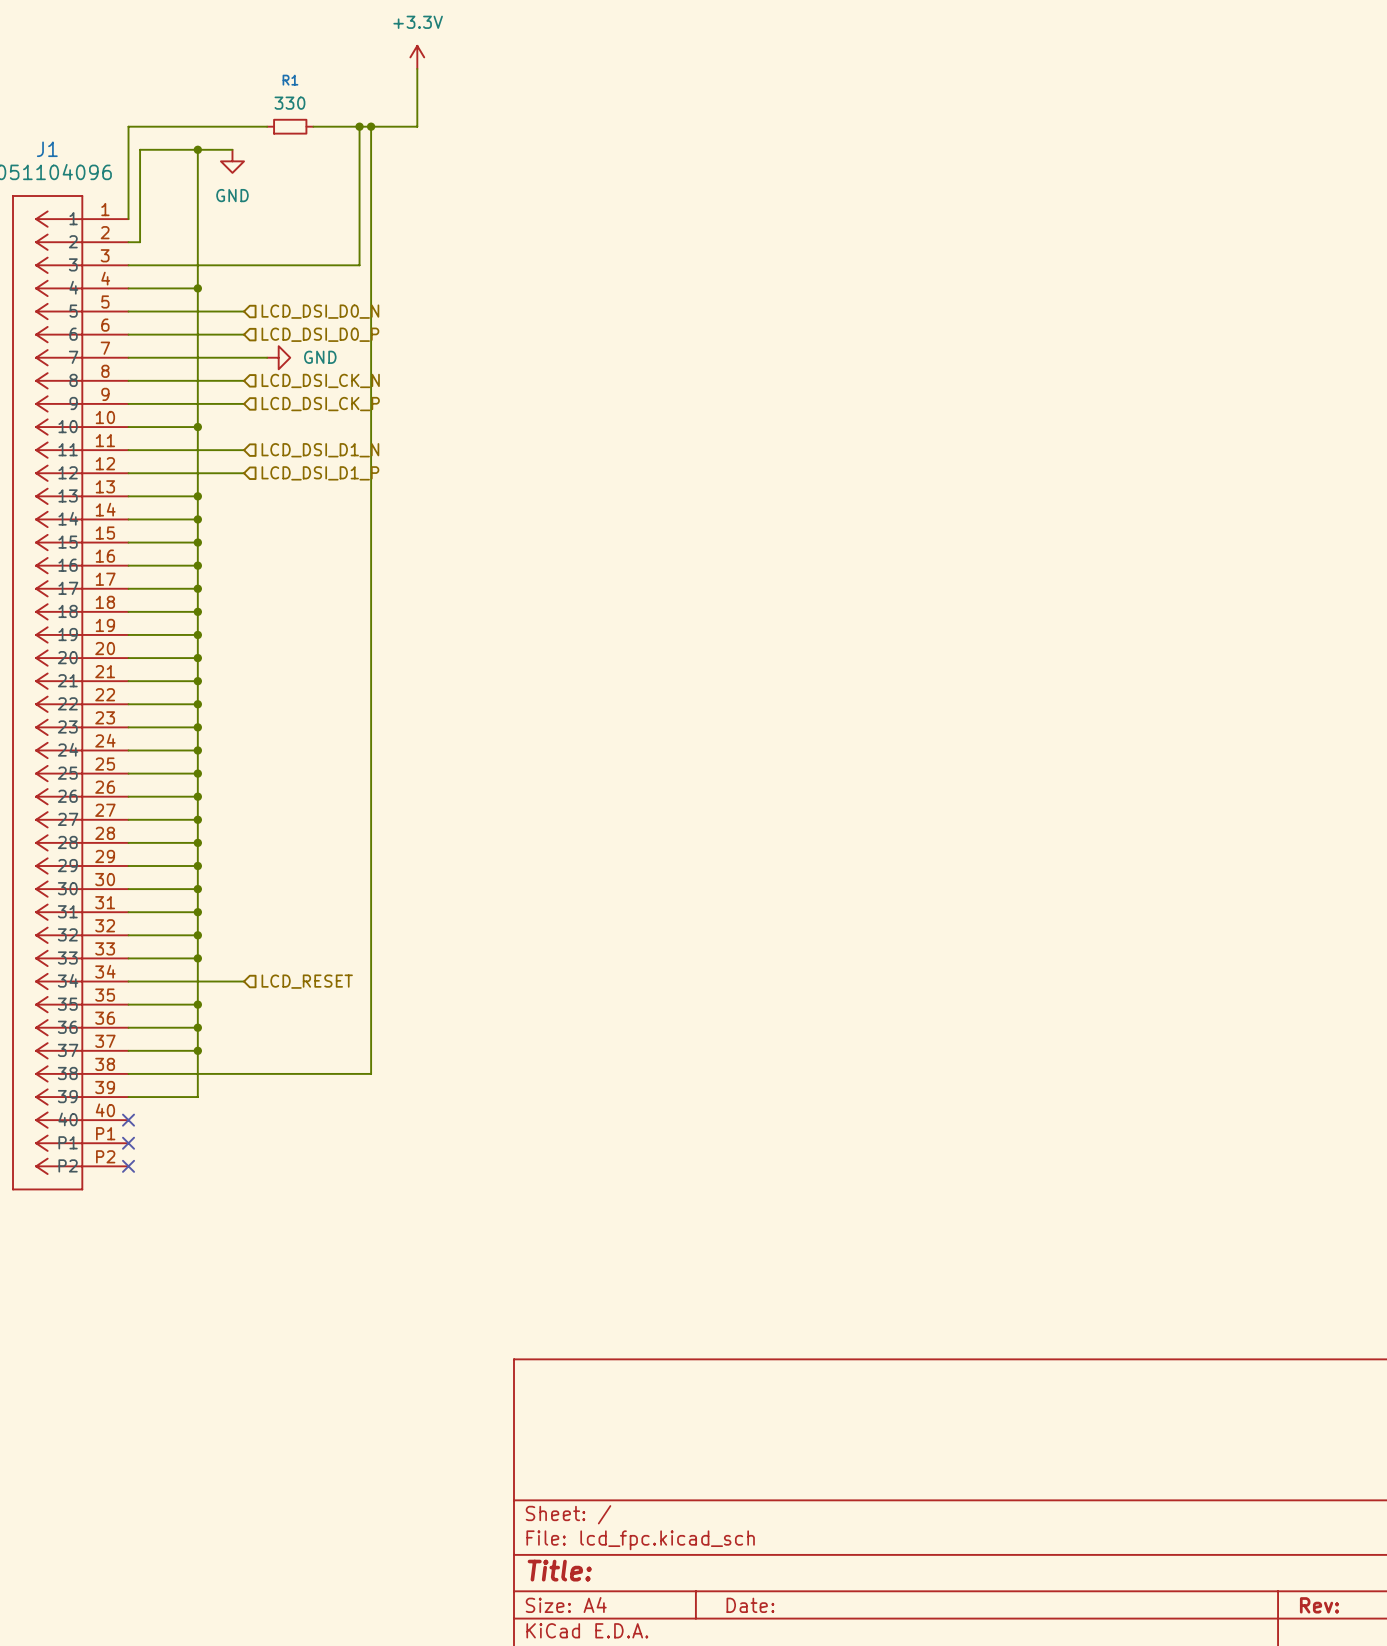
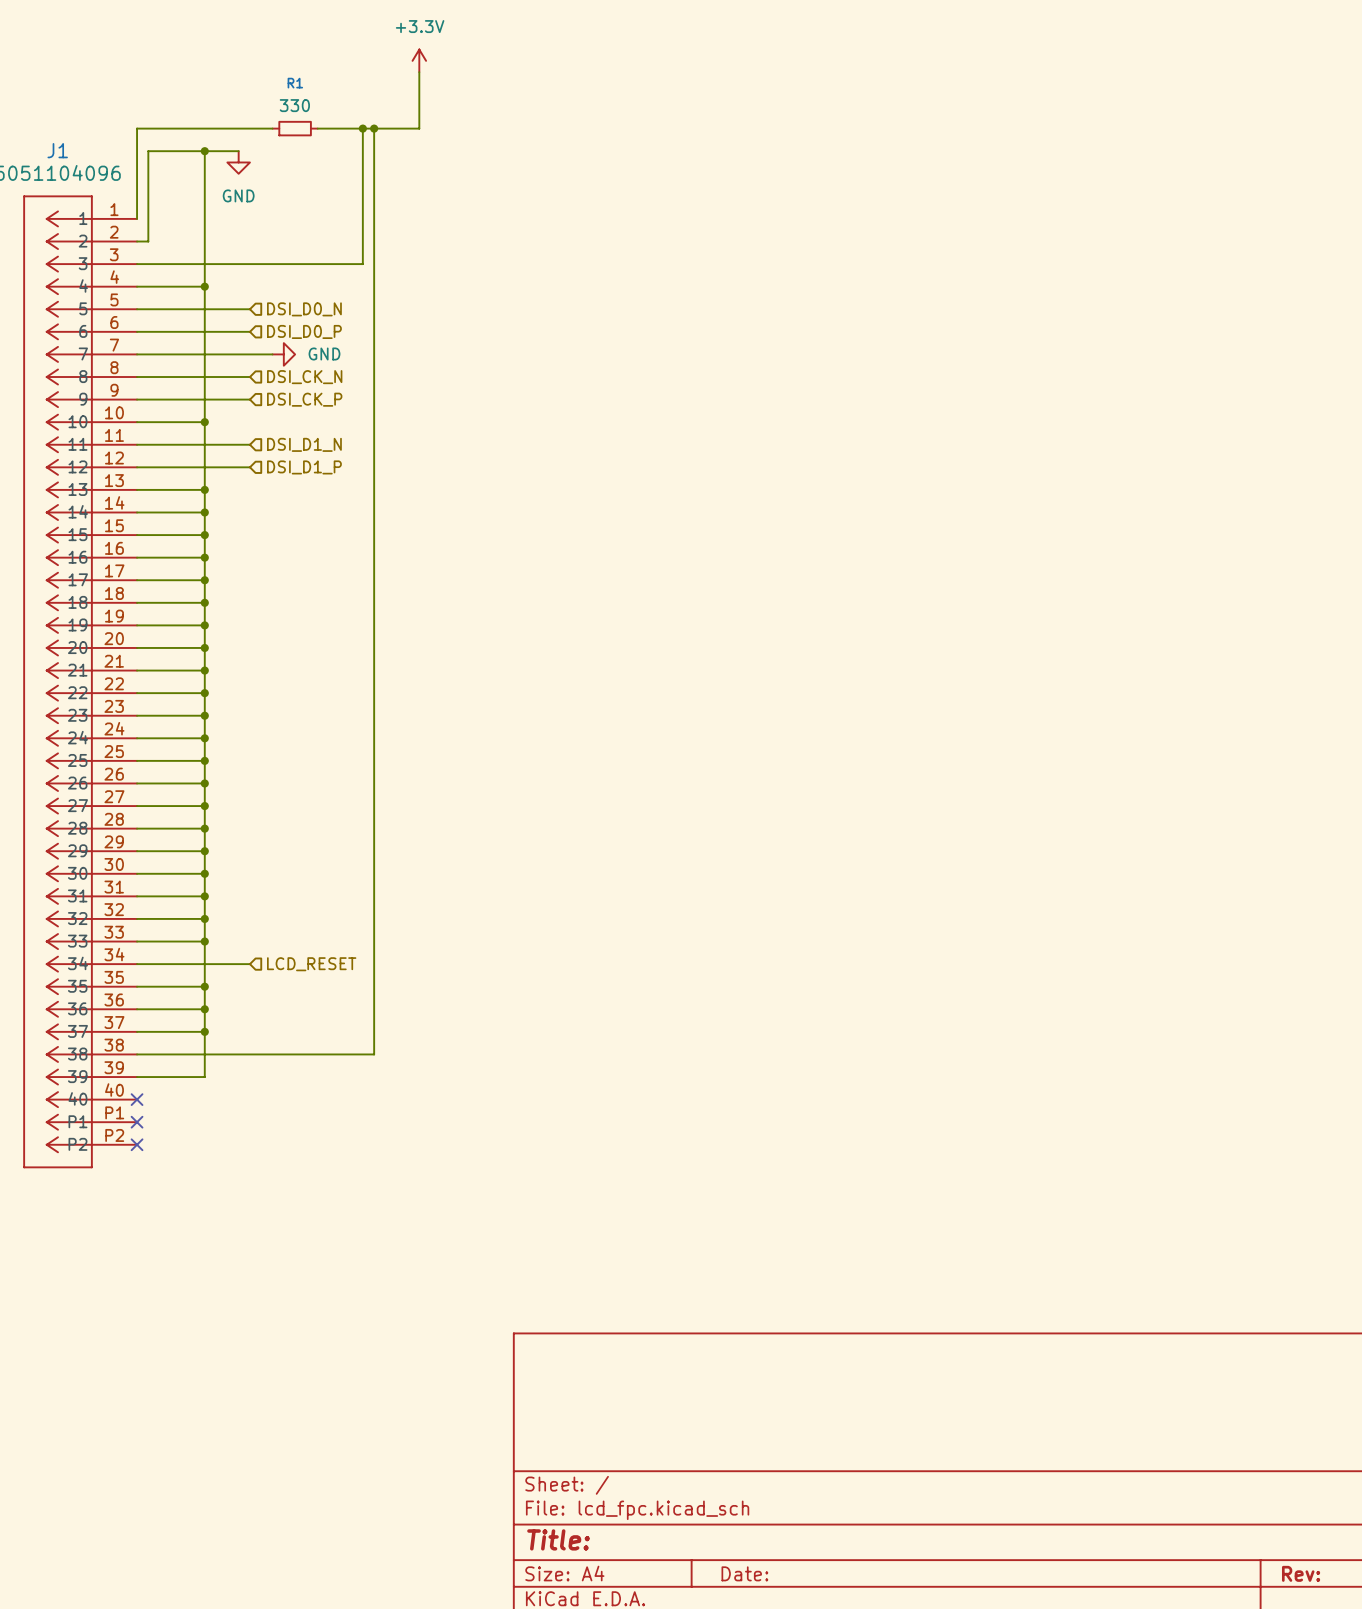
hierarchical label: LCD_DSI_D0_N (320, 311) -> DSI_D0_N (304, 309)
hierarchical label: LCD_DSI_D0_P (320, 334) -> DSI_D0_P (304, 331)
hierarchical label: LCD_DSI_CK_N (320, 380) -> DSI_CK_N (304, 377)
hierarchical label: LCD_DSI_CK_P (320, 404) -> DSI_CK_P (304, 399)
hierarchical label: LCD_DSI_D1_N (320, 450) -> DSI_D1_N (304, 444)
hierarchical label: LCD_DSI_D1_P (320, 473) -> DSI_D1_P (304, 467)

